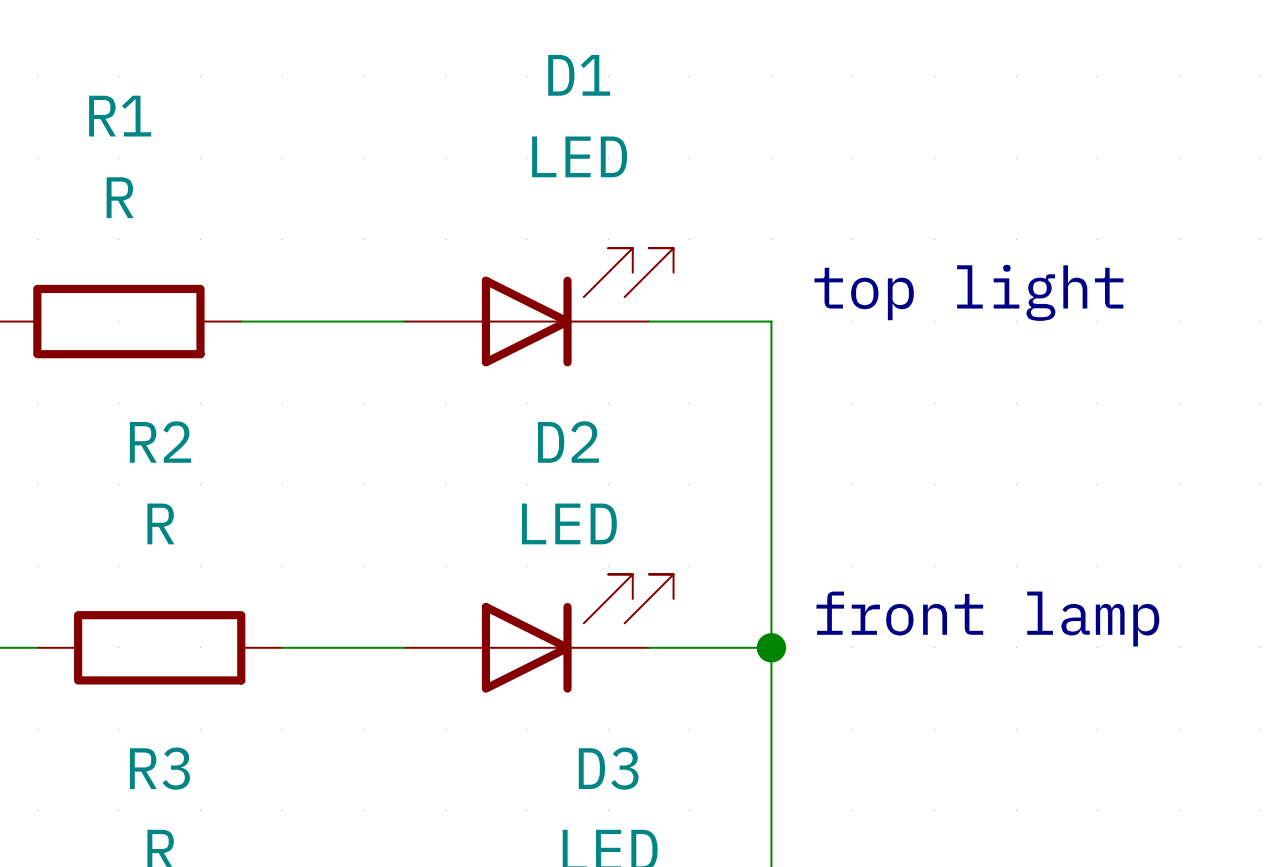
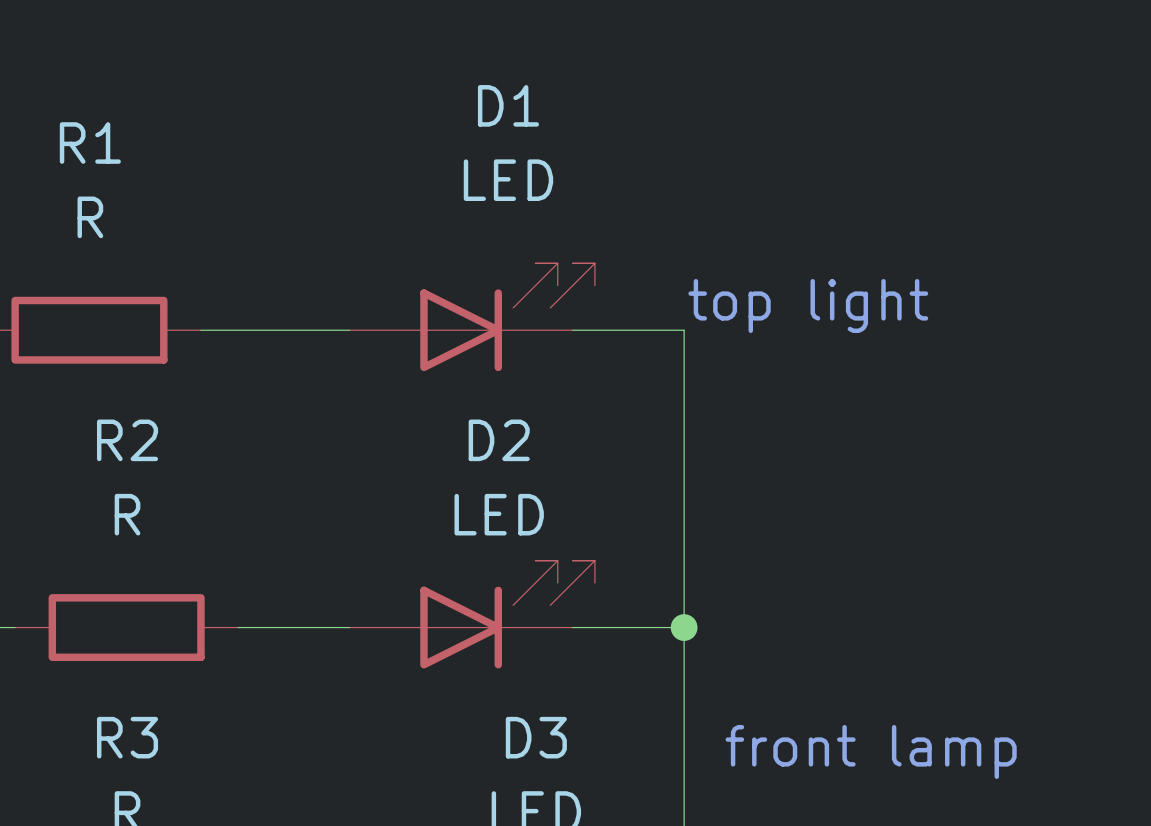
text position: top light (968, 292) -> top light (808, 305)
text position: front lamp (987, 619) -> front lamp (871, 751)

